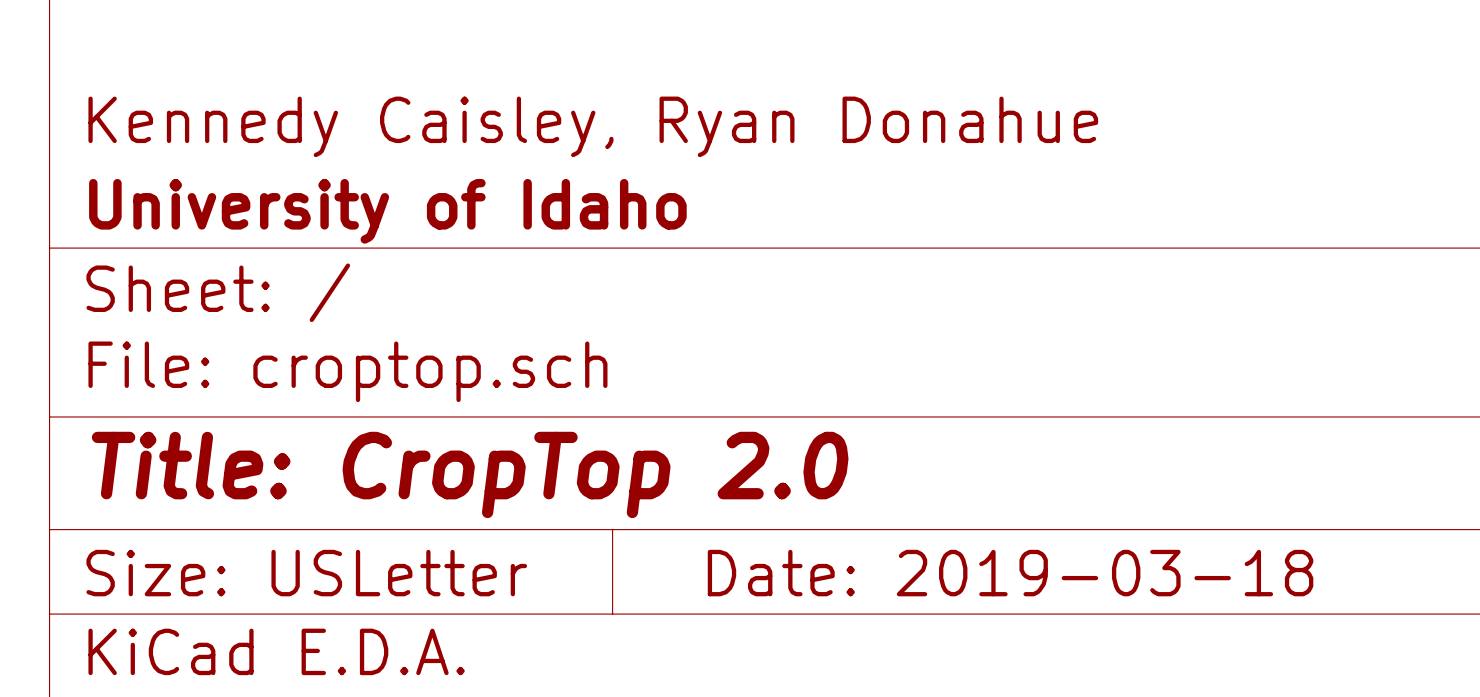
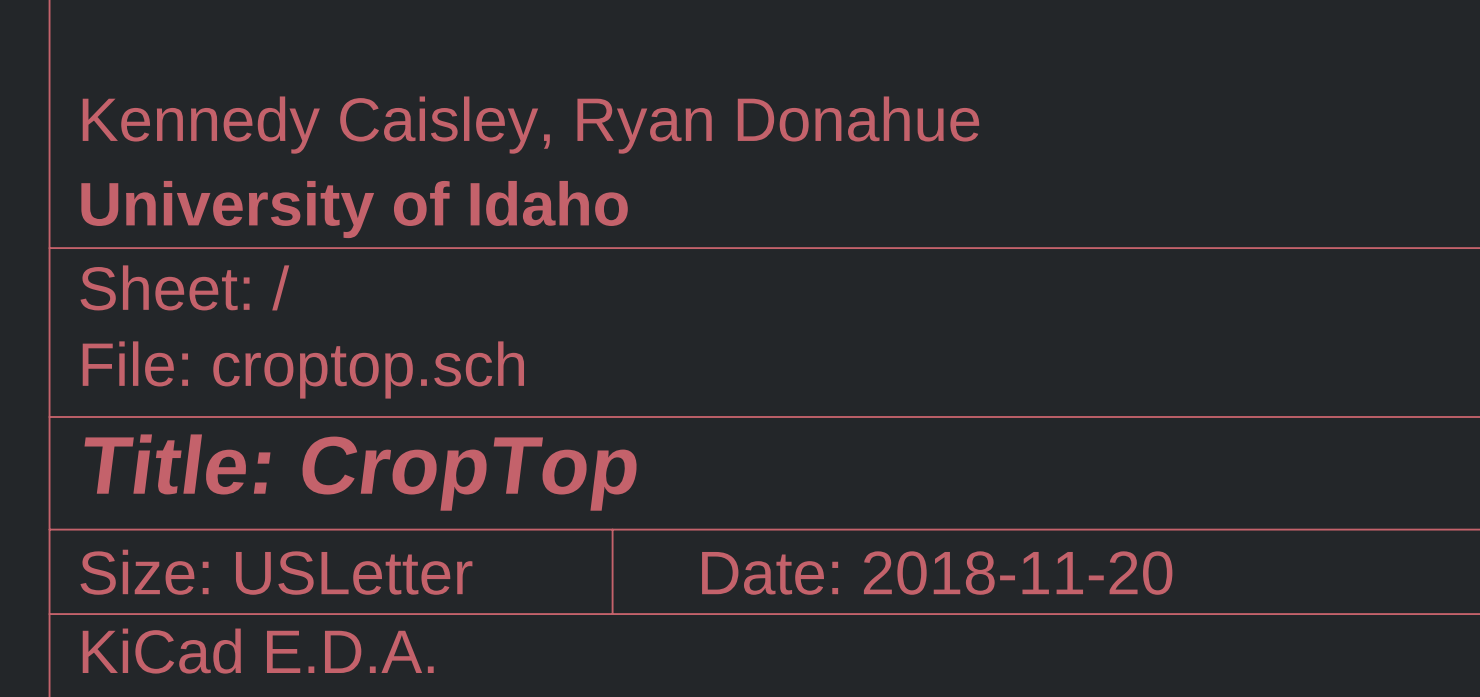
title block: Title: CropTop 2.0 (470, 474) -> Title: CropTop (361, 472)
title block: Date: 2019-03-18 (1010, 573) -> Date: 2018-11-20 (937, 573)

